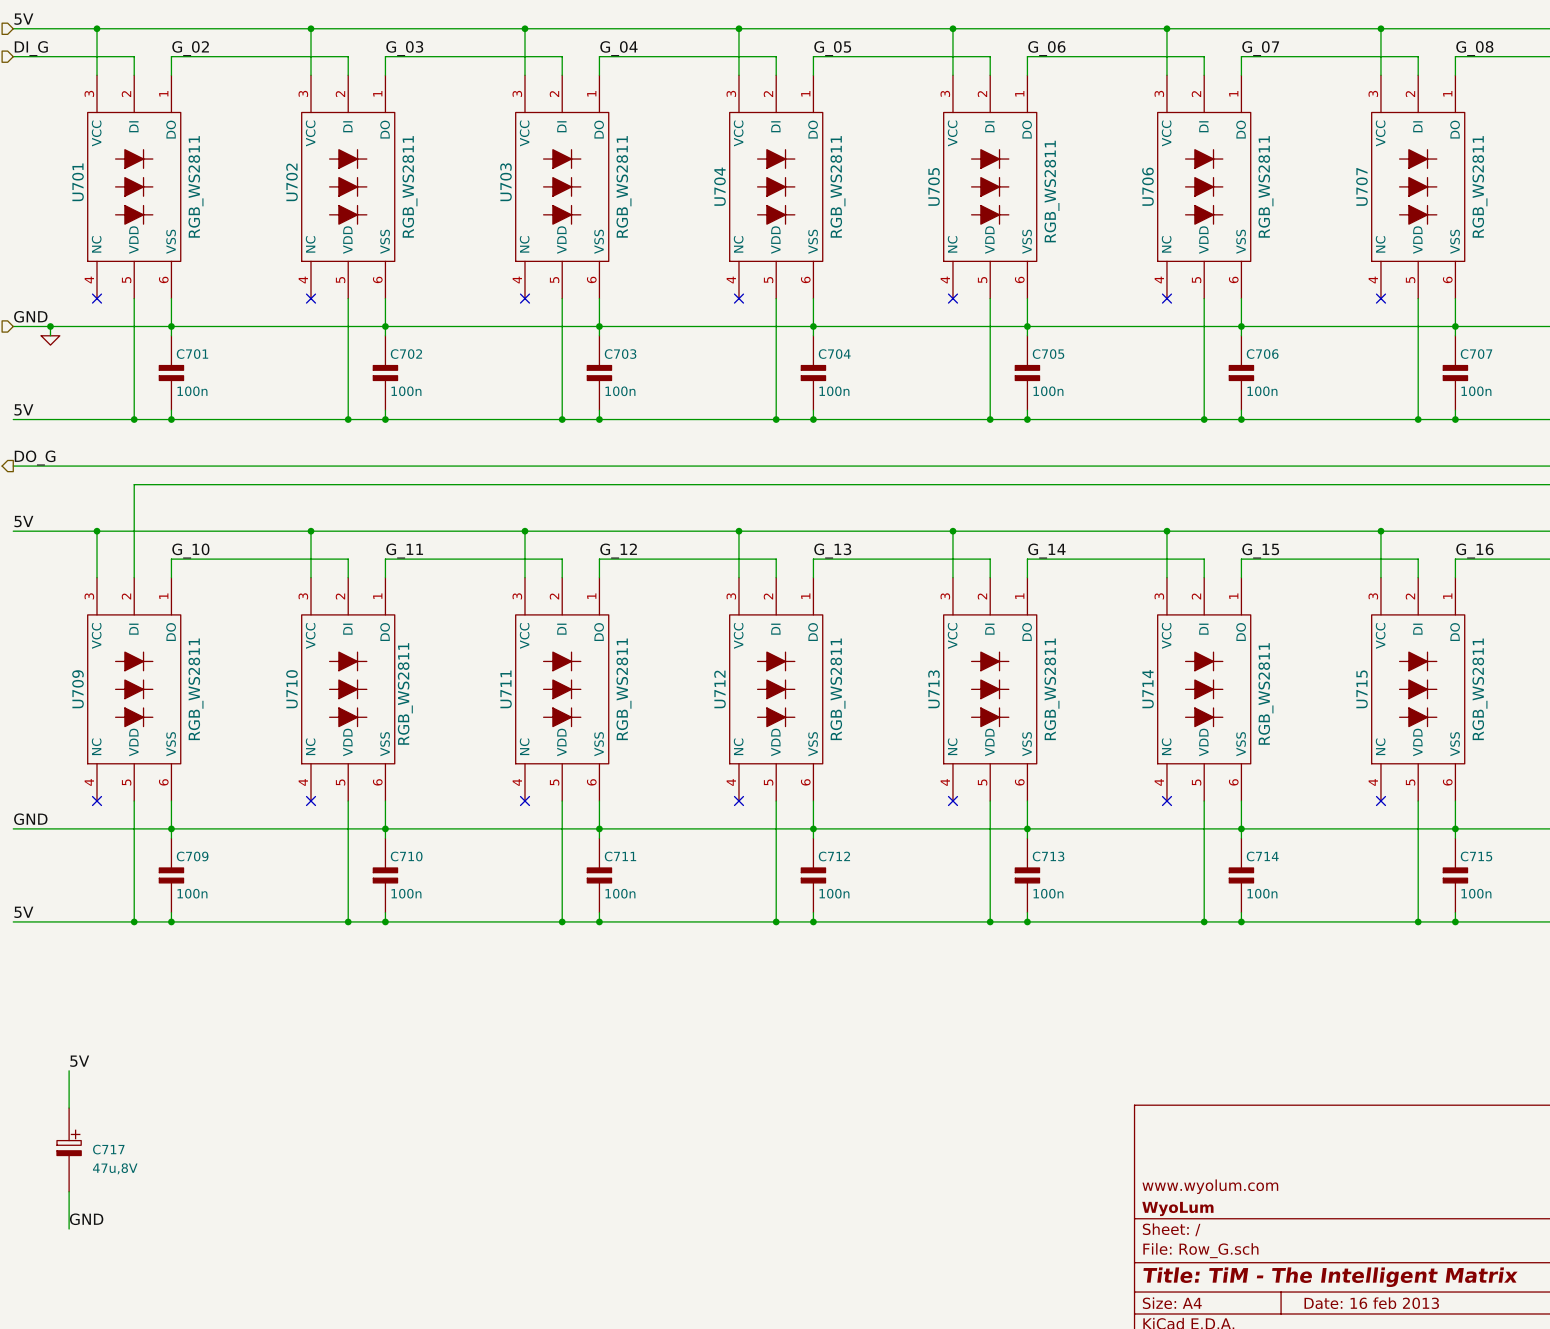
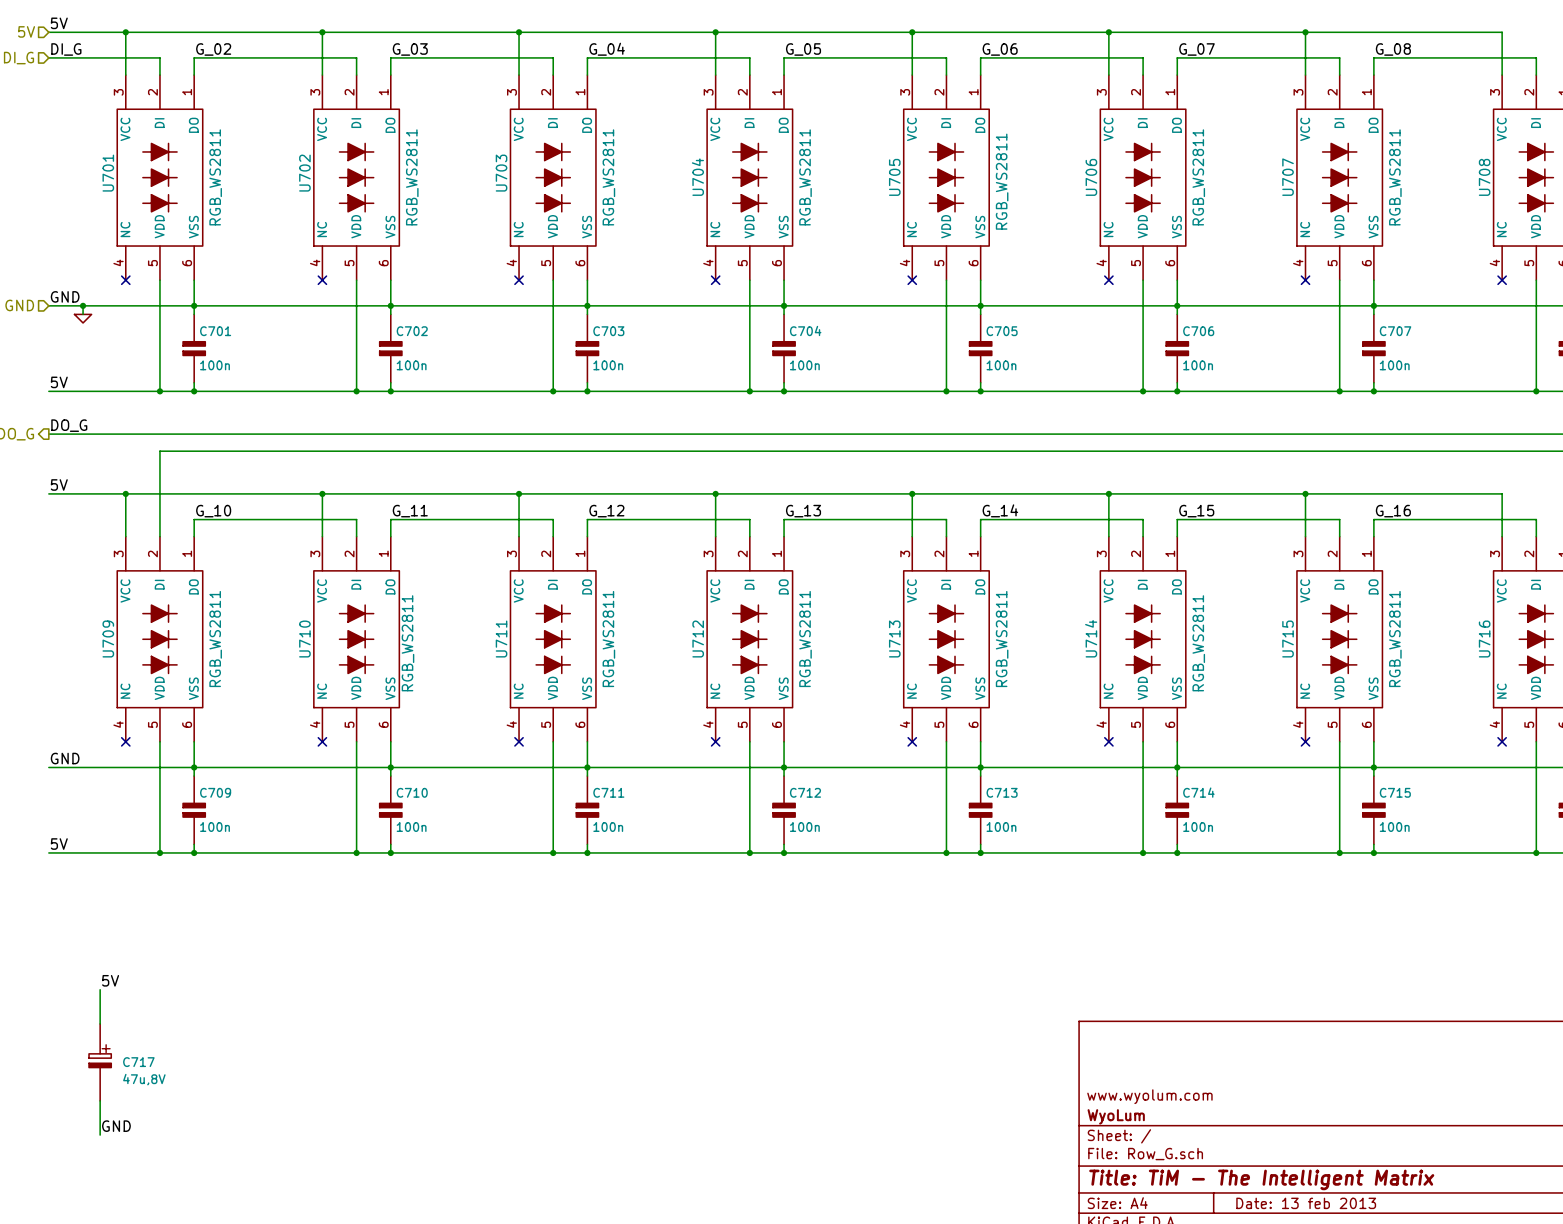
title block: Date: 16 feb 2013 (1371, 1303) -> Date: 13 feb 2013 (1306, 1203)

